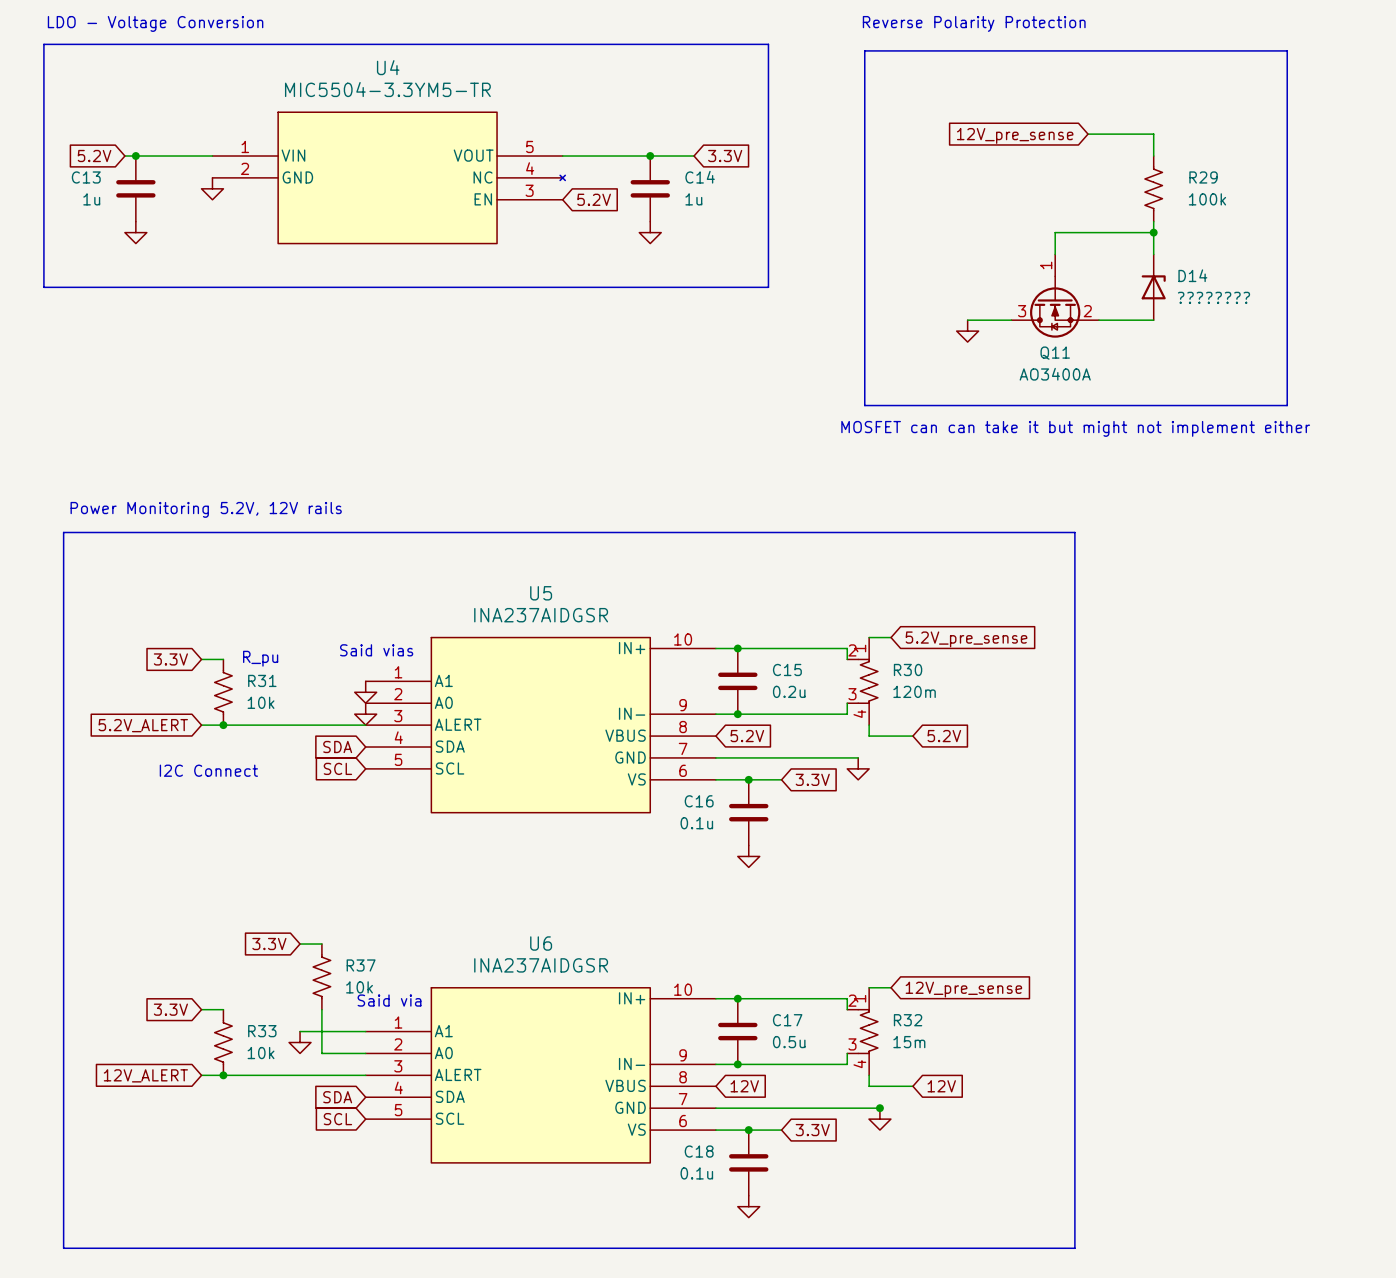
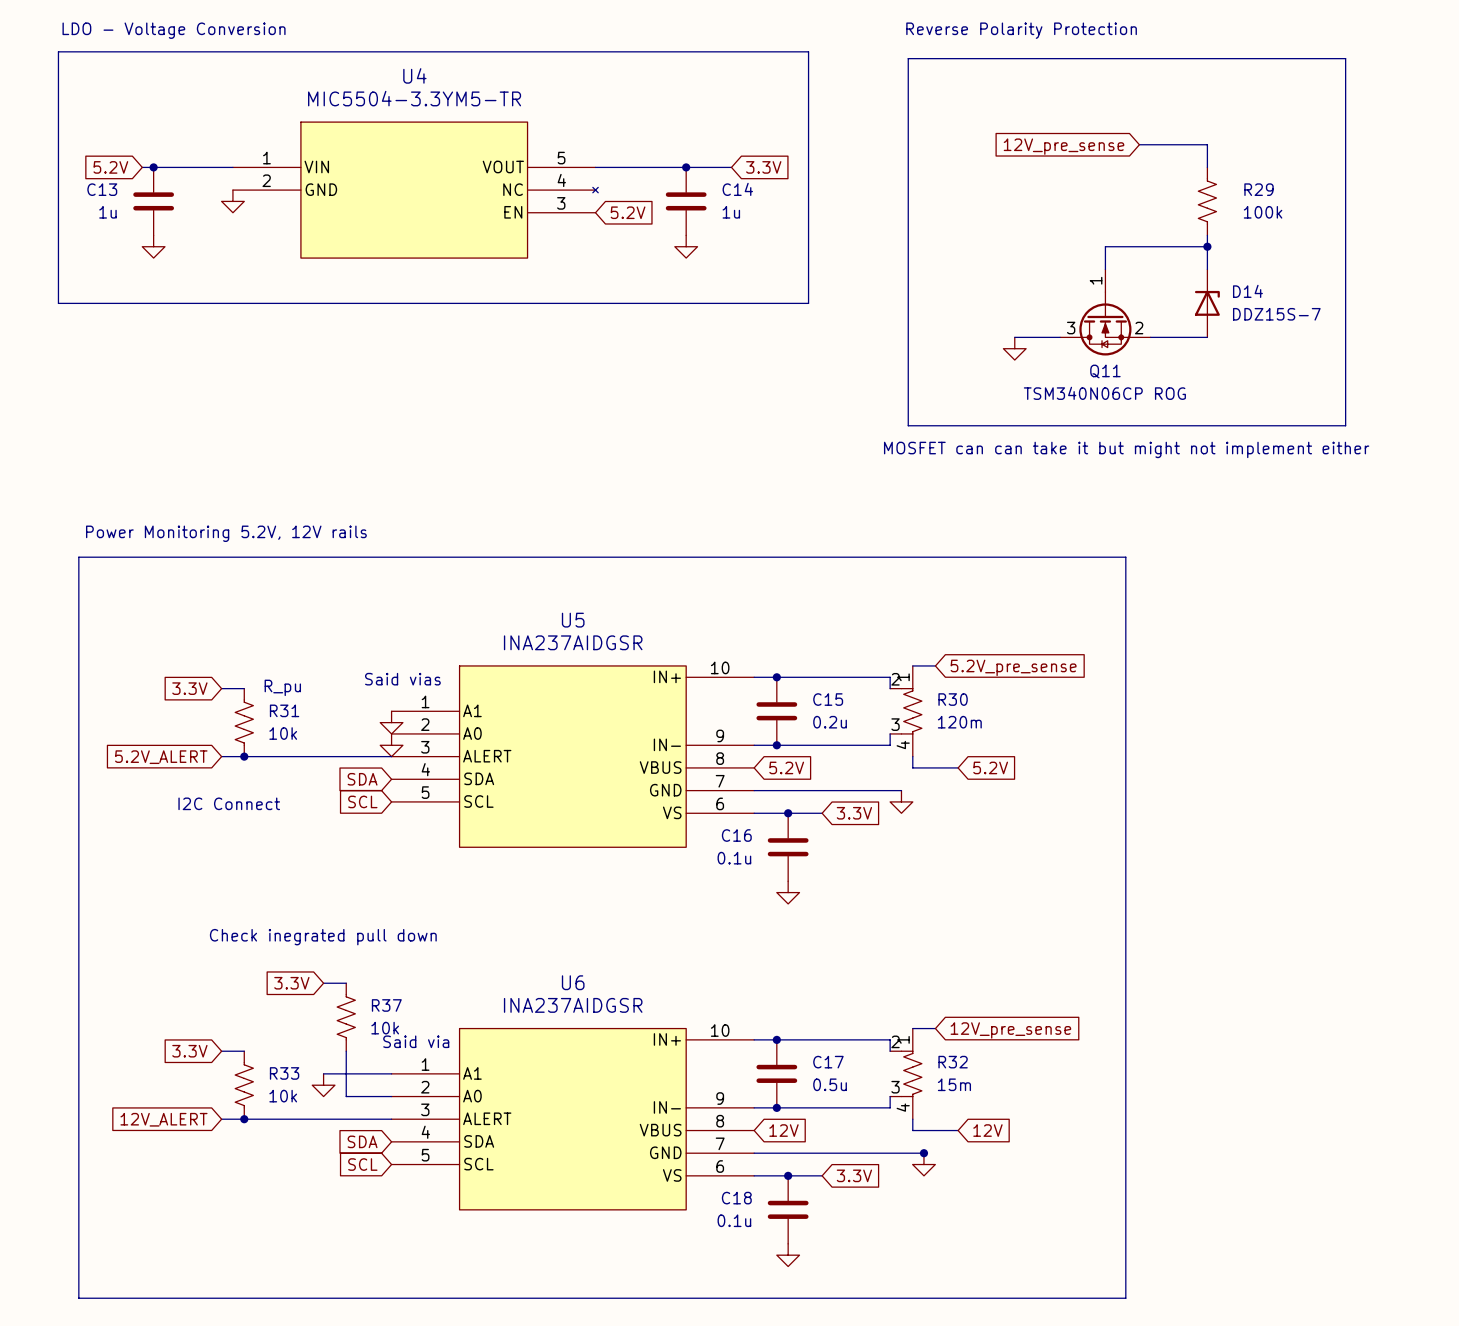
D14 value: ???????? (1213, 297) -> DDZ15S-7 (1276, 314)
Q11 value: AO3400A (1055, 374) -> TSM340N06CP ROG (1104, 393)
text: none -> Check inegrated pull down (323, 937)

